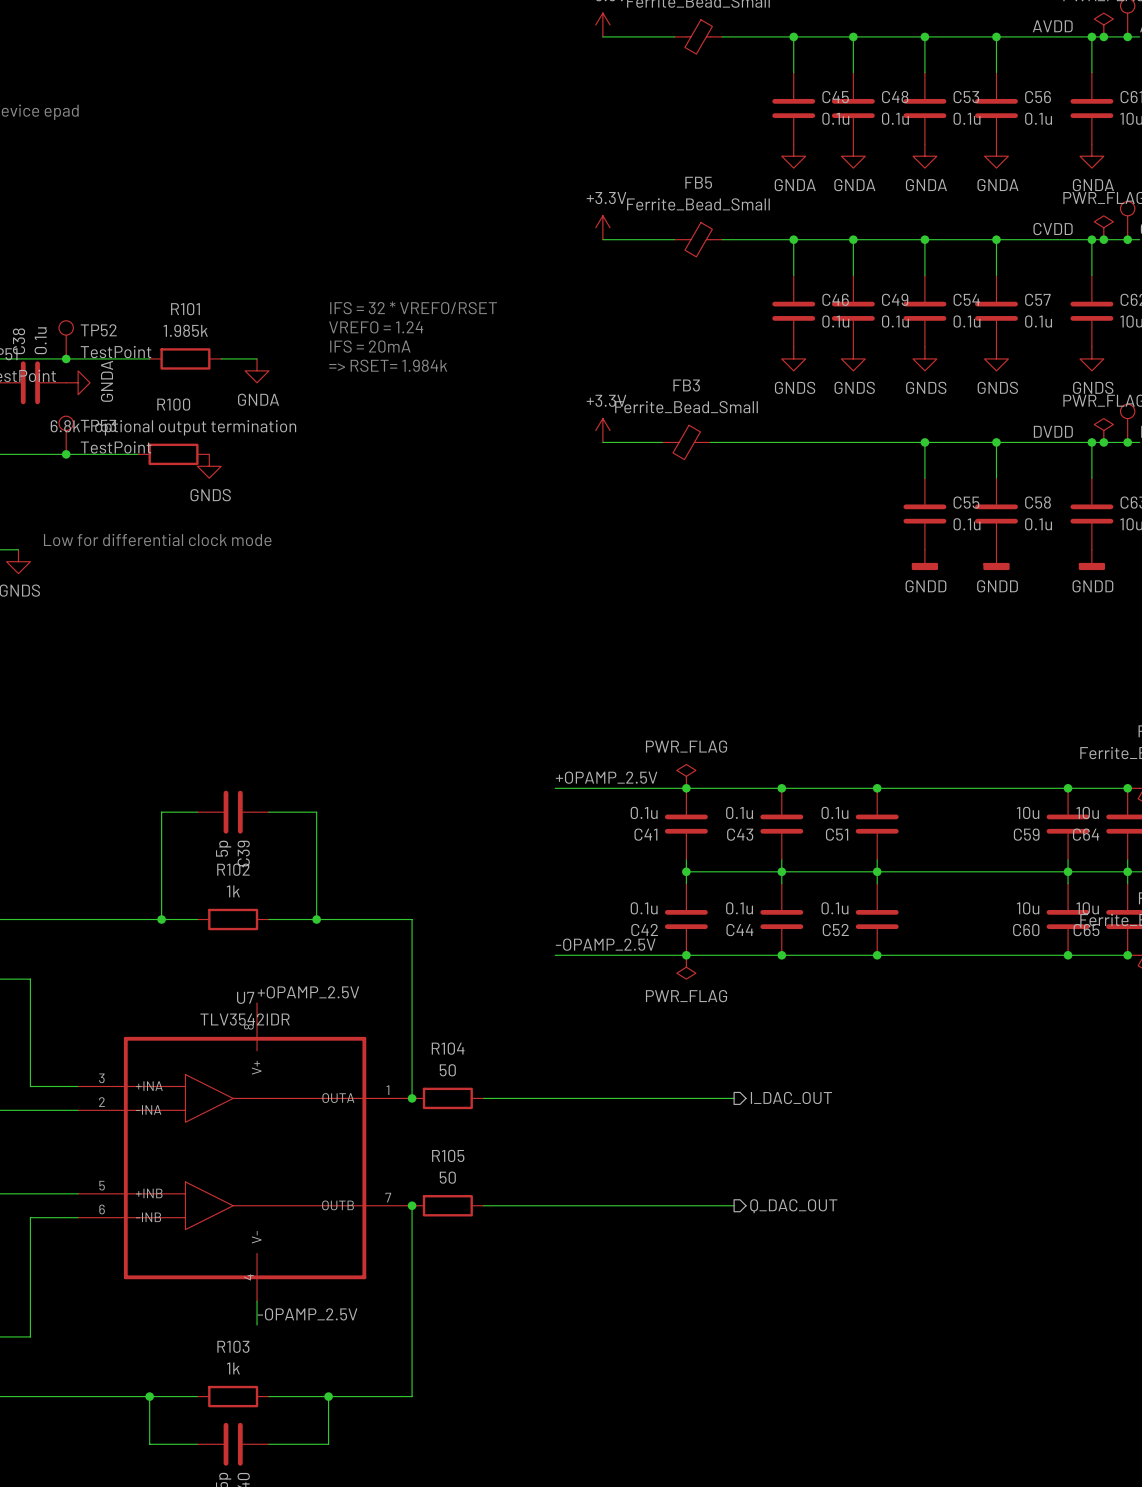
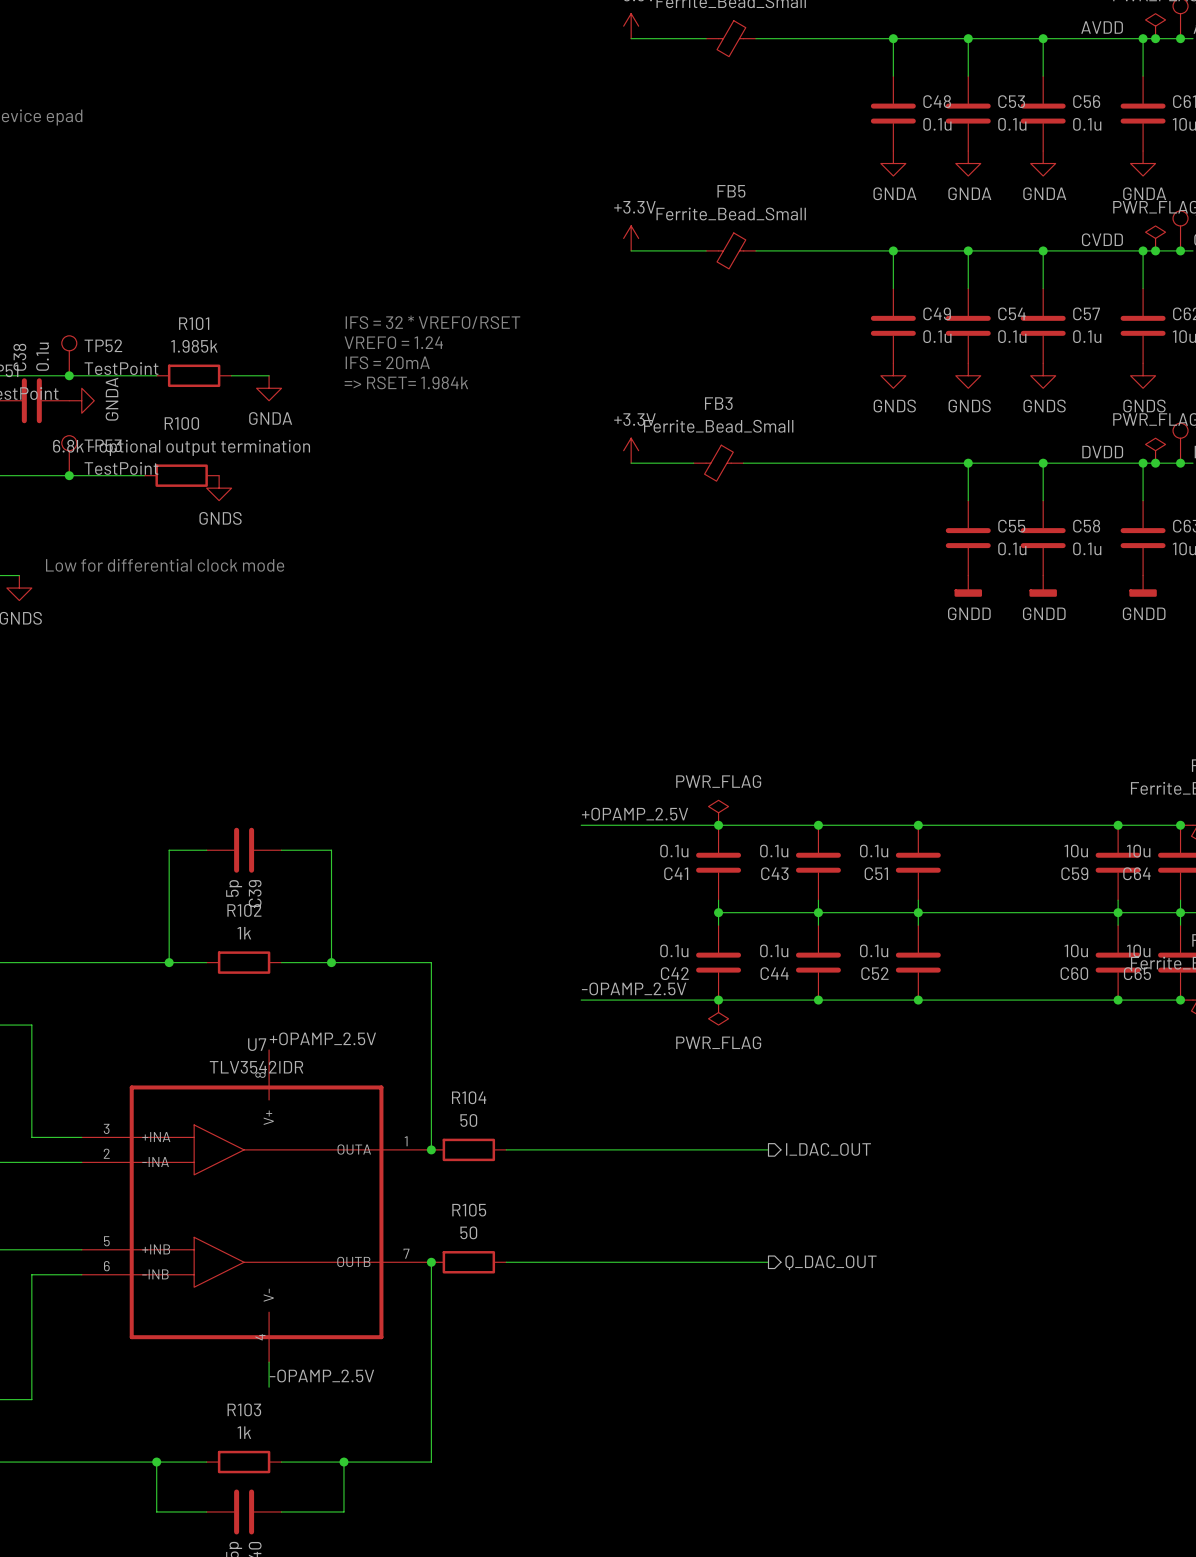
wire: (793, 36) (793, 72) -> none
junction: (793, 36) -> none
C45: 0.1u (793, 108) -> none
power symbol: GNDA (793, 156) -> none
wire: (793, 239) (793, 275) -> none
junction: (793, 239) -> none
C46: 0.1u (793, 311) -> none
power symbol: GNDS (793, 358) -> none

